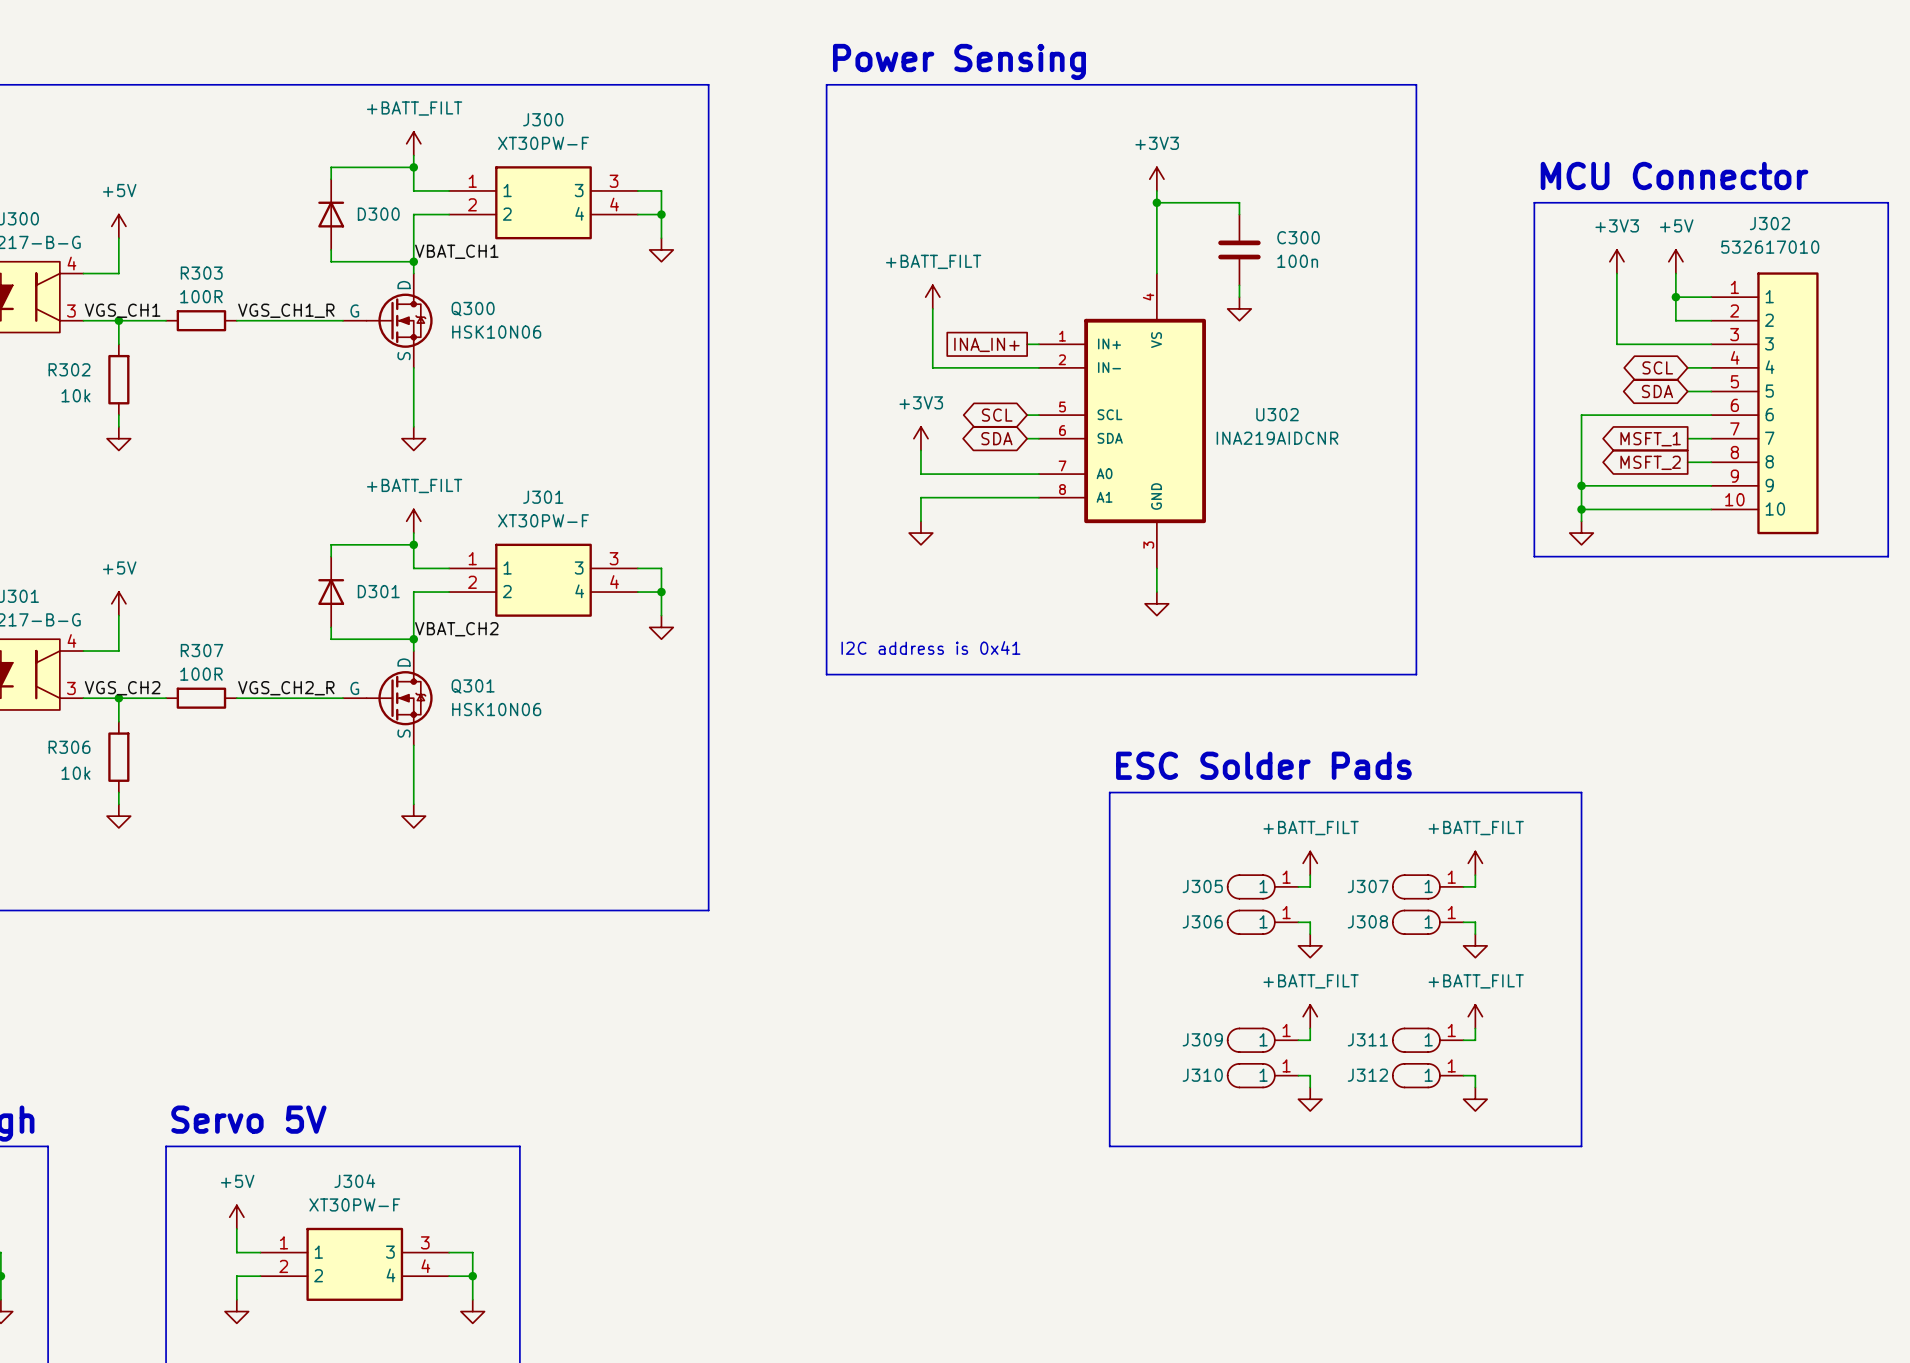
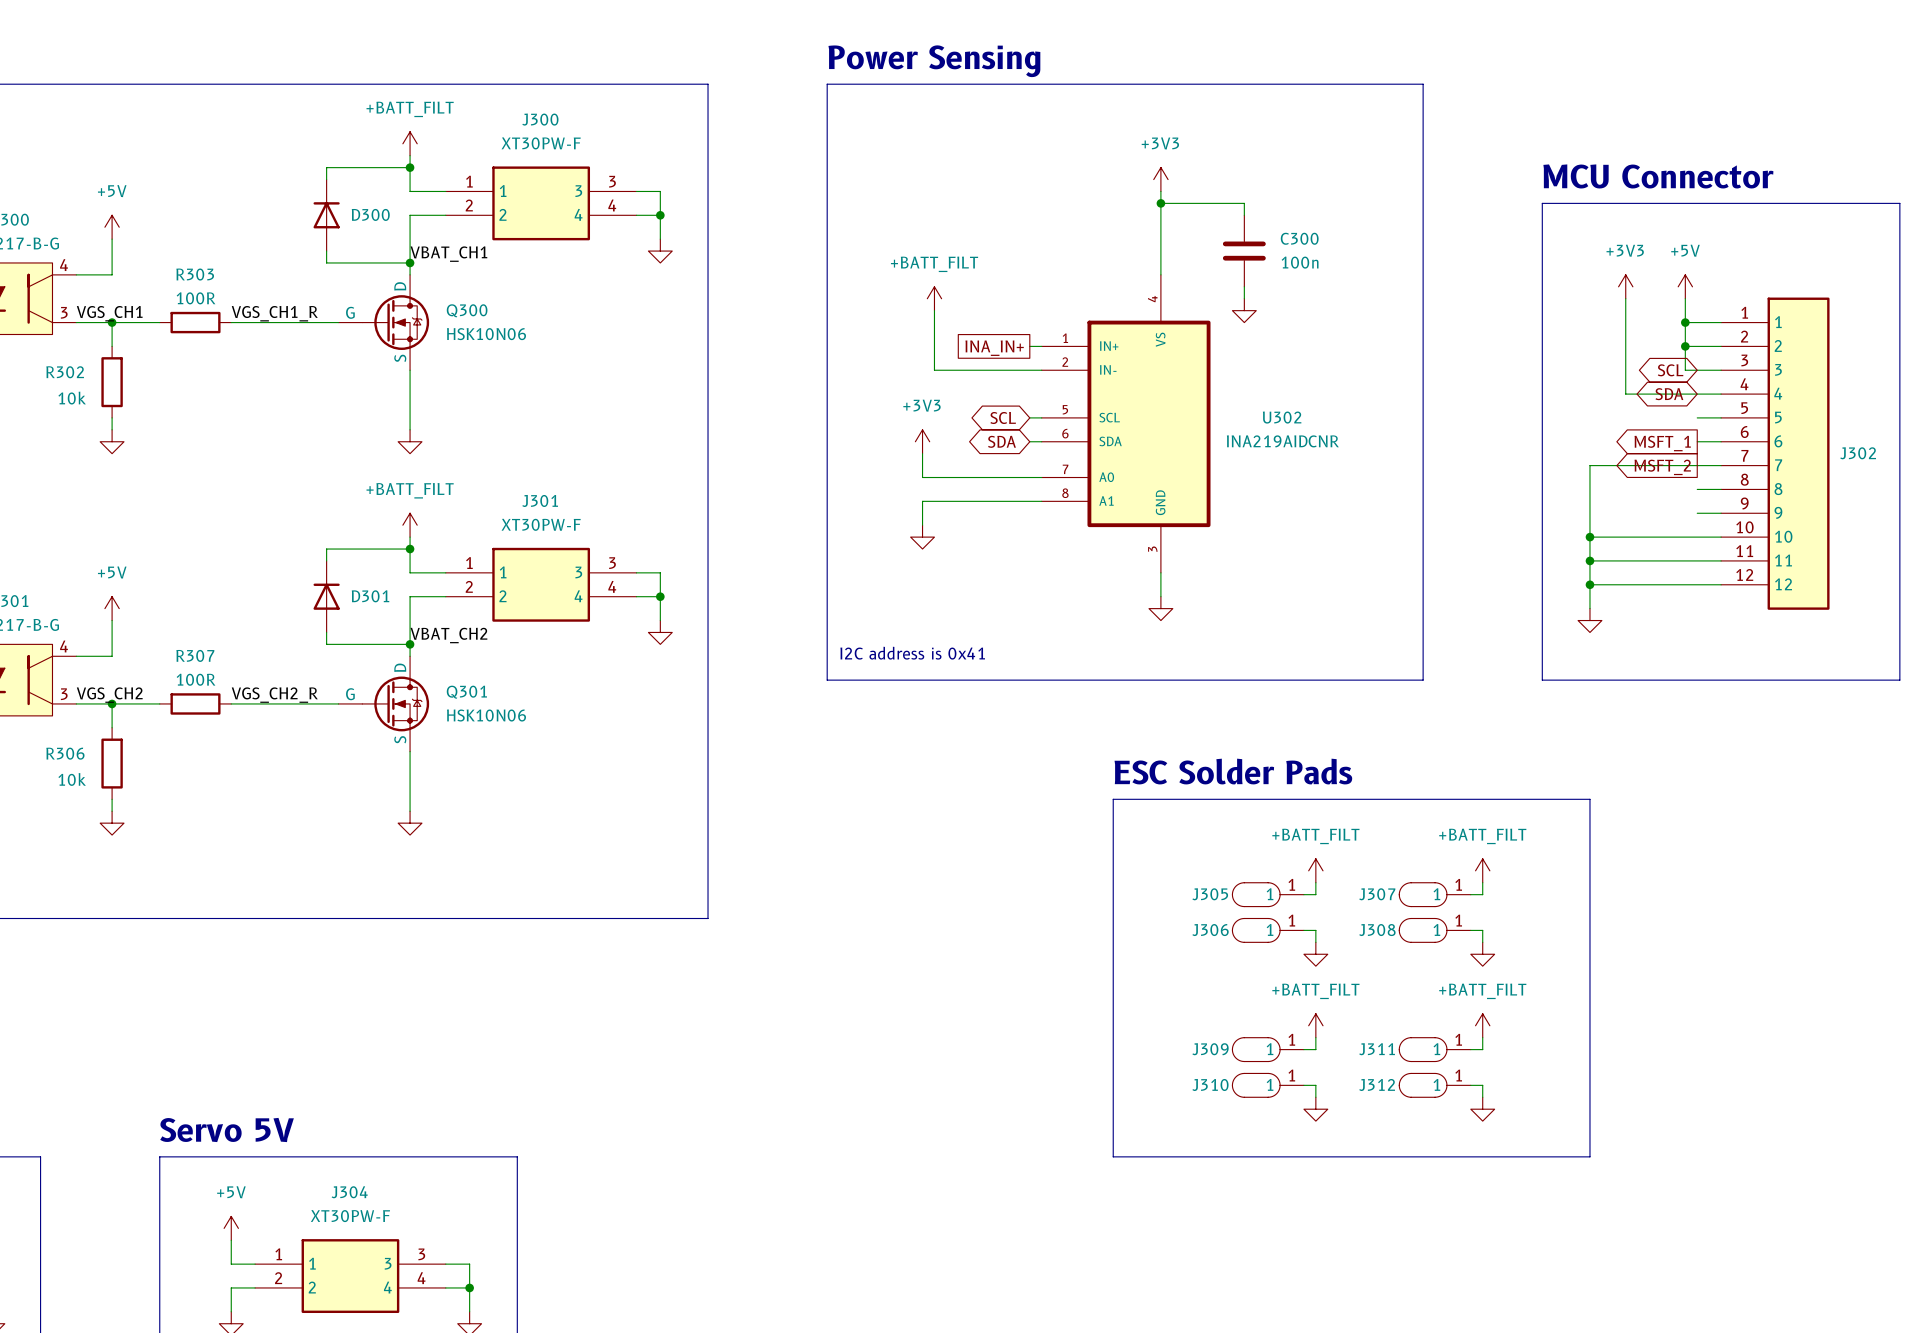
J302 name position: J302 (1769, 223) -> J302 (1858, 453)
J302 value: 532617010 (1770, 247) -> none
power symbol position: +3V3 (1616, 261) -> +3V3 (1625, 286)
power symbol position: +5V (1675, 261) -> +5V (1685, 286)
J302 symbol: [1711, 272, 1819, 535] -> [1721, 297, 1830, 610]
wire: (1675, 273) (1675, 297) (1711, 297) -> none
junction: (1675, 297) -> none
wire: none -> (1685, 322) (1685, 370) (1697, 370)
junction: none -> (1685, 322)
wire: (1616, 344) (1675, 344) -> (1625, 346) (1625, 394) (1697, 394)
junction: none -> (1685, 346)
wire: (1687, 415) (1581, 415) (1581, 462) -> (1697, 465) (1589, 465)
wire: (1581, 485) (1687, 485) -> none
junction: (1581, 485) -> none
wire: (1581, 509) (1687, 509) -> none
junction: (1581, 509) -> none
wire: none -> (1589, 525) (1589, 608)
wire: none -> (1589, 537) (1721, 537)
junction: none -> (1589, 537)
power symbol position: (1581, 533) -> (1589, 620)
line: (1534, 556) (1888, 556) -> (1542, 560) (1542, 680) (1899, 680) (1899, 560)
junction: none -> (1589, 560)
wire: none -> (1589, 584) (1721, 584)
junction: none -> (1589, 584)

